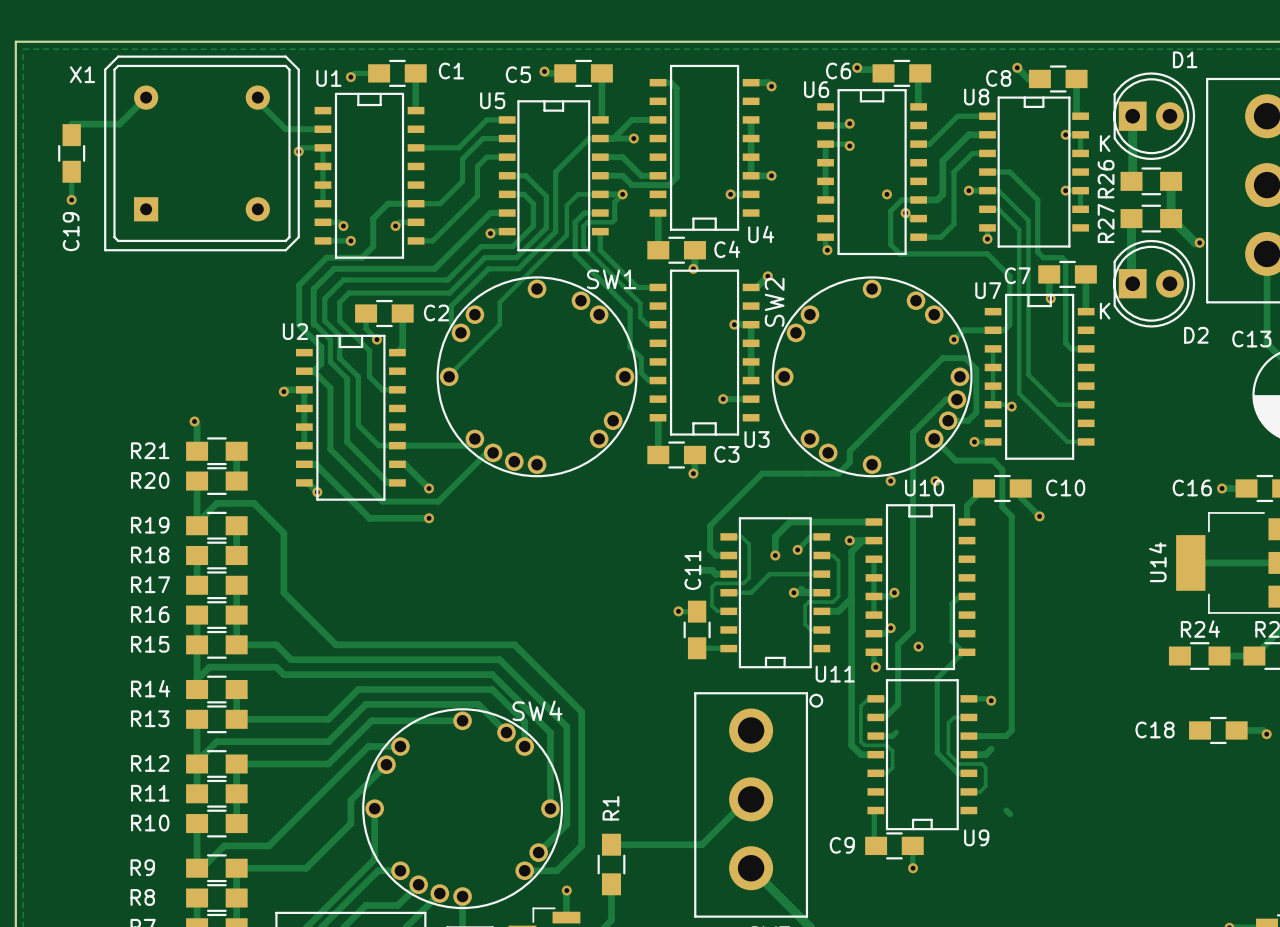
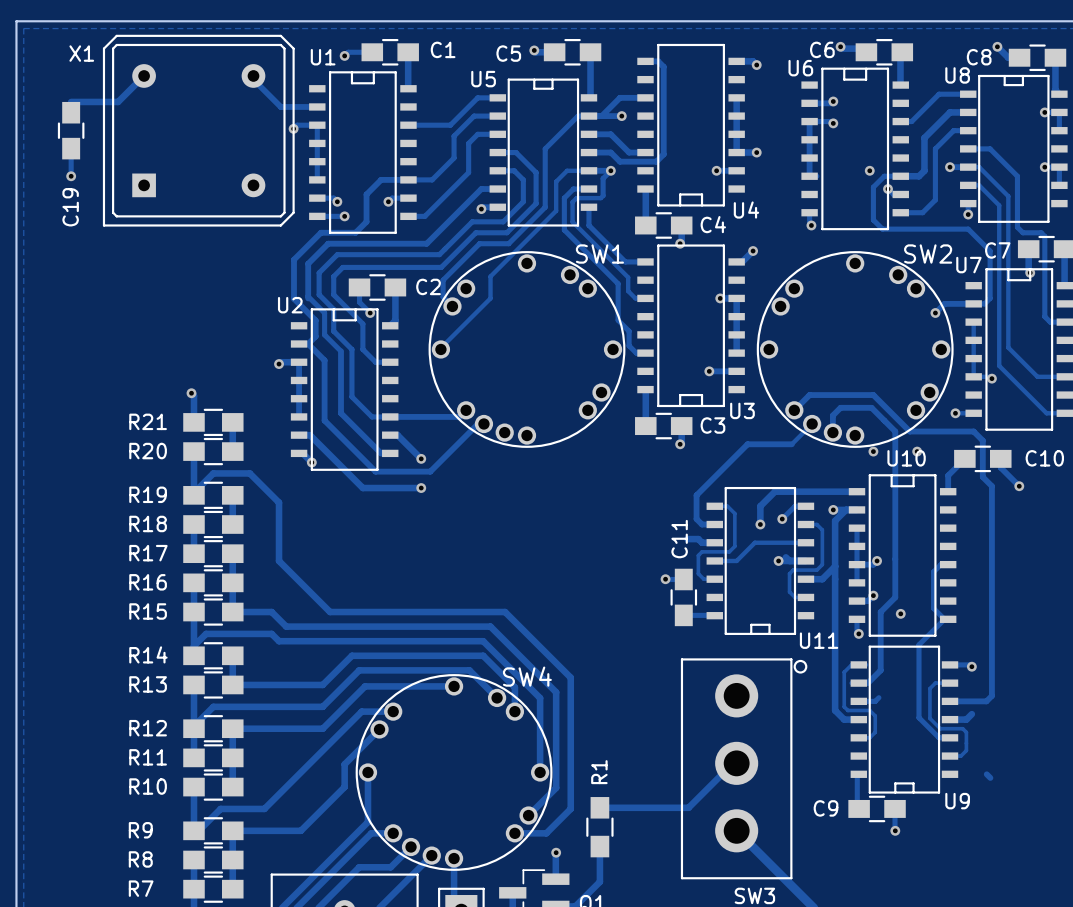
SW2 rotation: 0° (872, 376) -> 90° clockwise (855, 349)
track: (956, 399) (946, 399) (913, 432) (913, 460) -> (832, 432) (832, 415) (840, 407) (871, 407) (895, 431)
track: (948, 420) (968, 420) (976, 412) (976, 369) (965, 358) (942, 358) (849, 451) (849, 462) (838, 473) (807, 473) -> (812, 424) (791, 444)
track: (934, 438) (955, 460) -> (794, 410) (809, 395) (873, 395) (909, 431) (937, 431)

